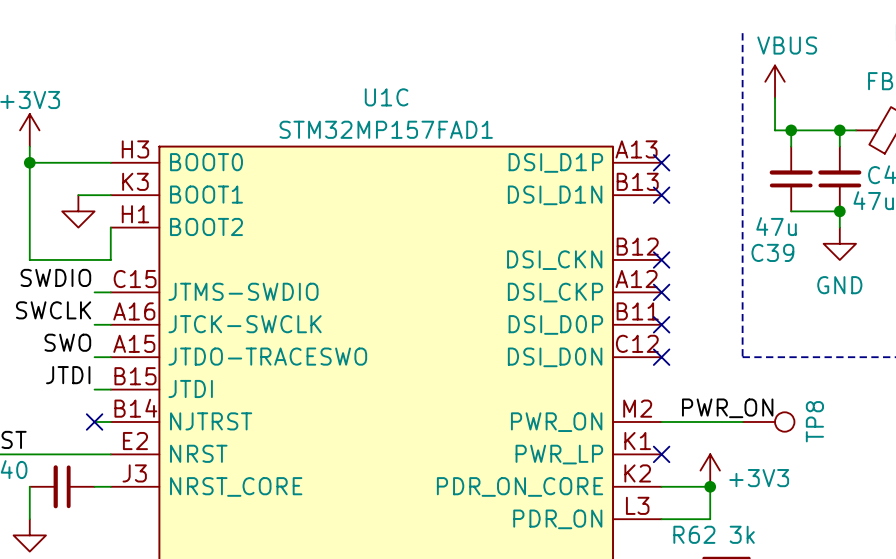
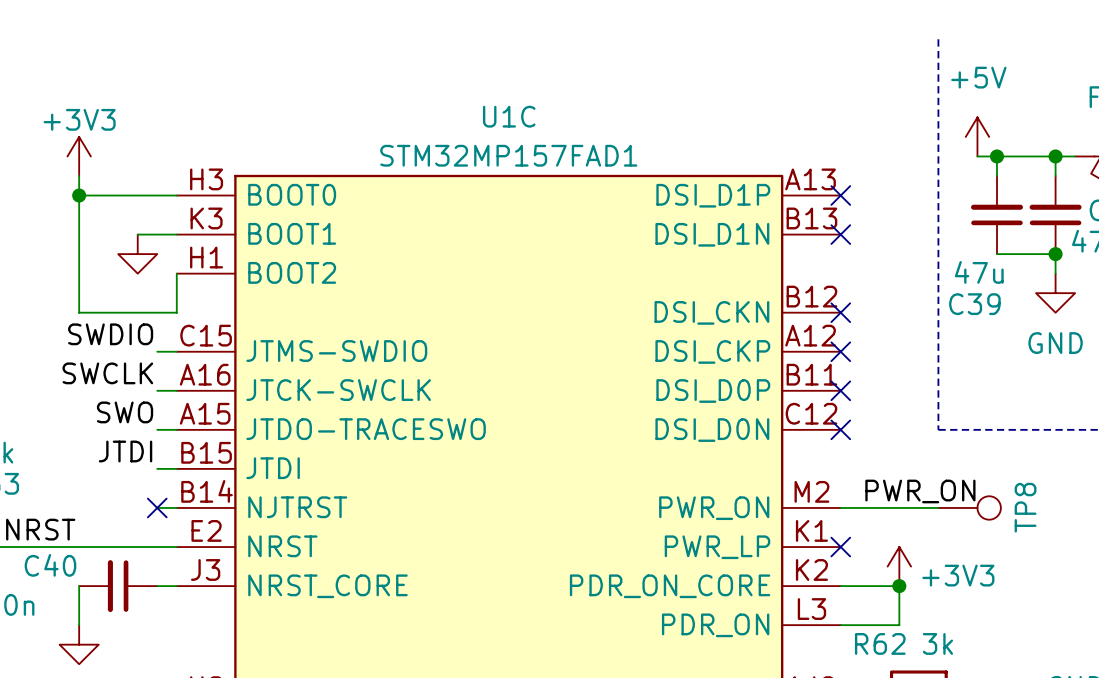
power symbol: VBUS (775, 81) -> none
power symbol: none -> +5V (977, 136)

